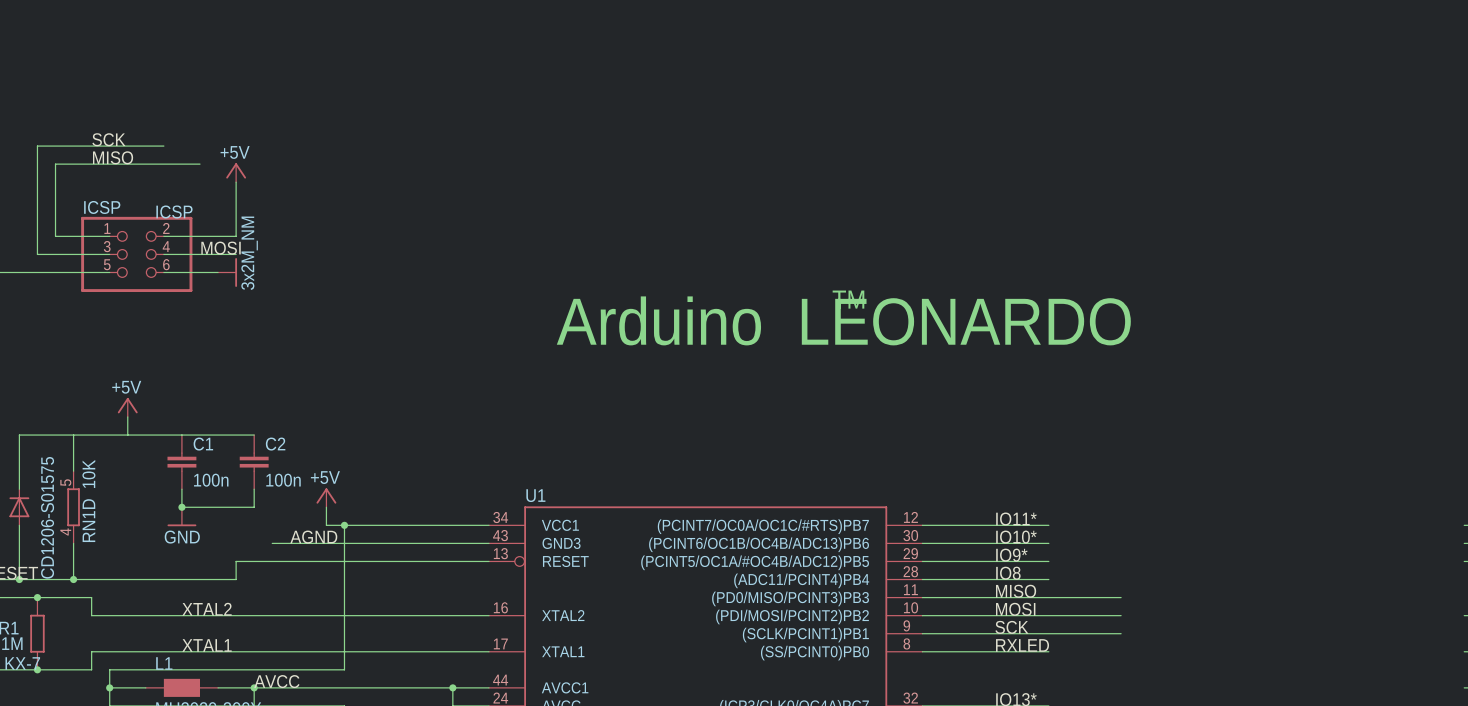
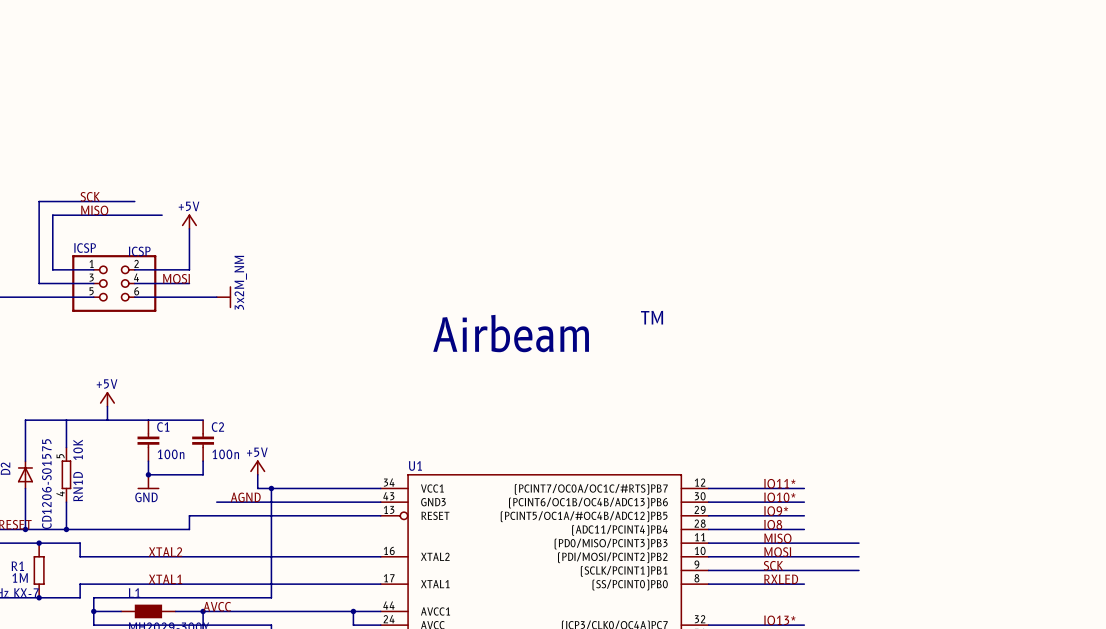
wire: none -> (175, 297) (216, 297)
power symbol position: 3x2M_NM (227, 272) -> 3x2M_NM (223, 297)
text: Arduino LEONARDO (843, 320) -> Airbeam (511, 333)

